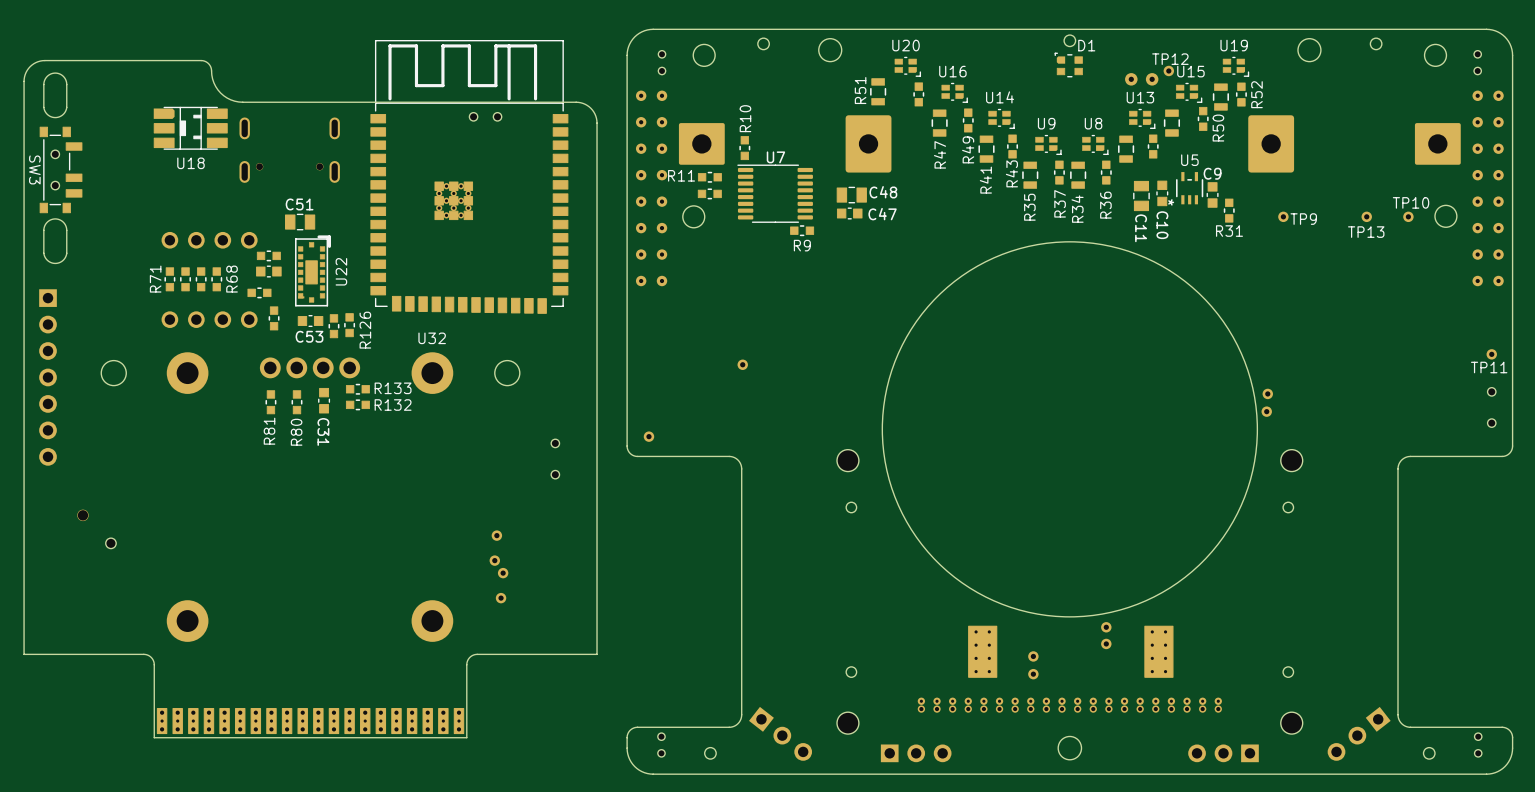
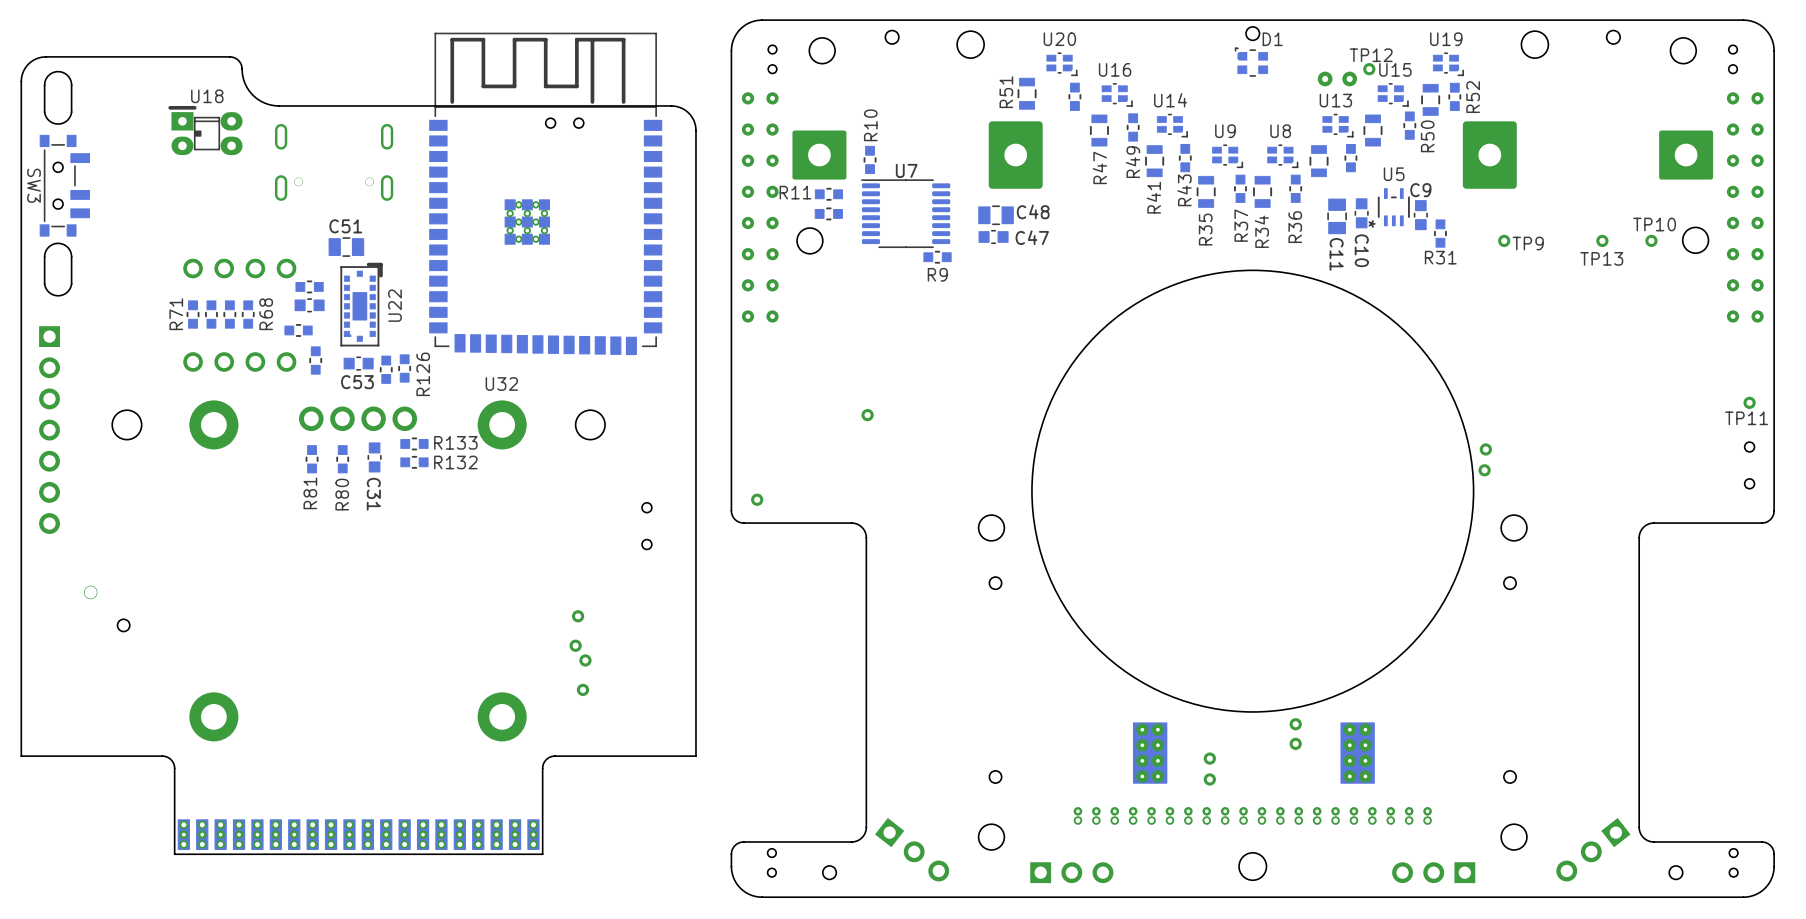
U18 footprint: [153, 106, 228, 150] -> [168, 105, 243, 156]
U18 name position: U18 (190, 163) -> U18 (207, 96)

